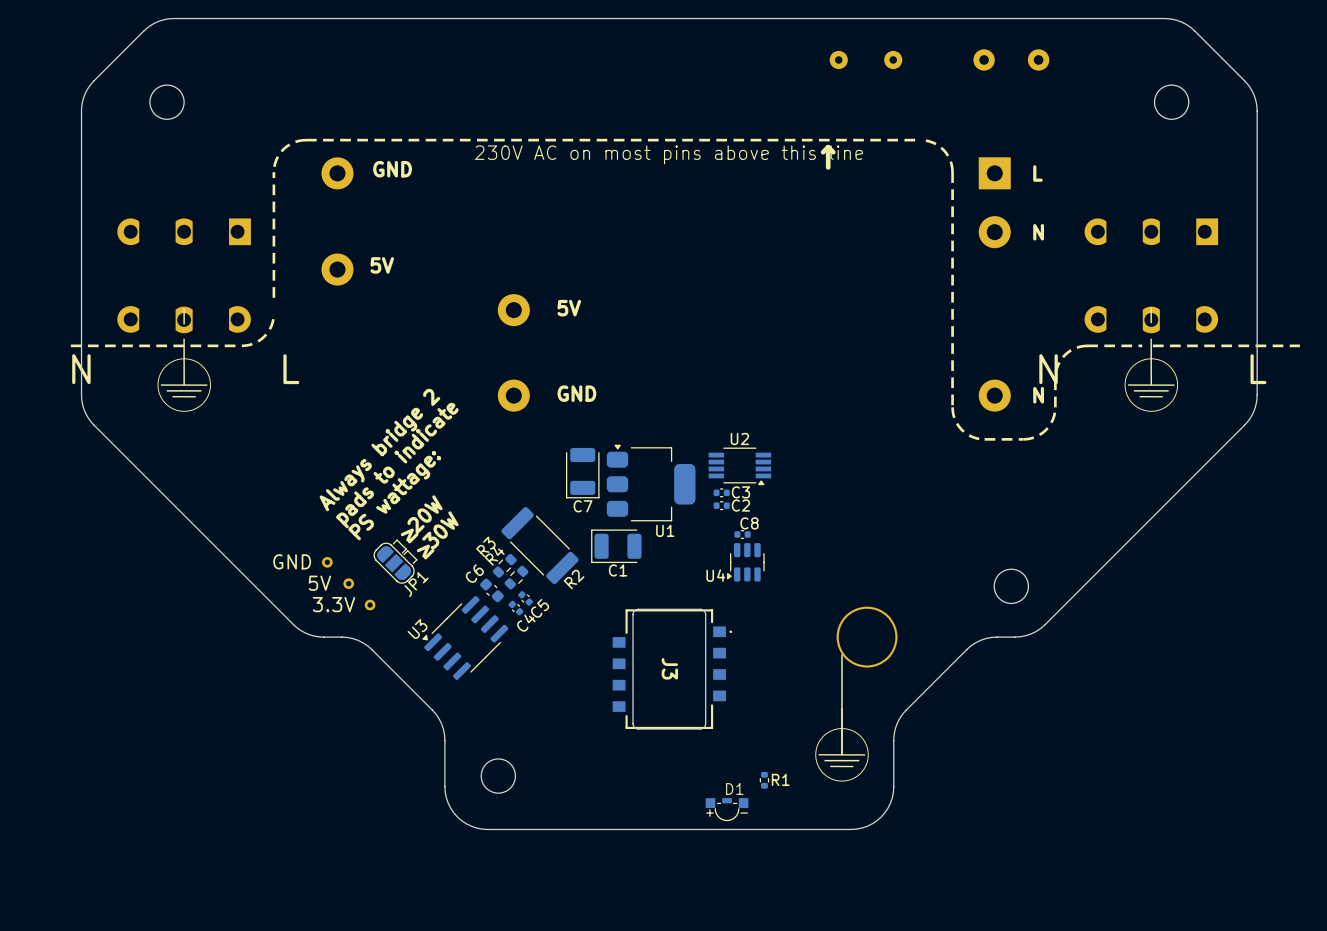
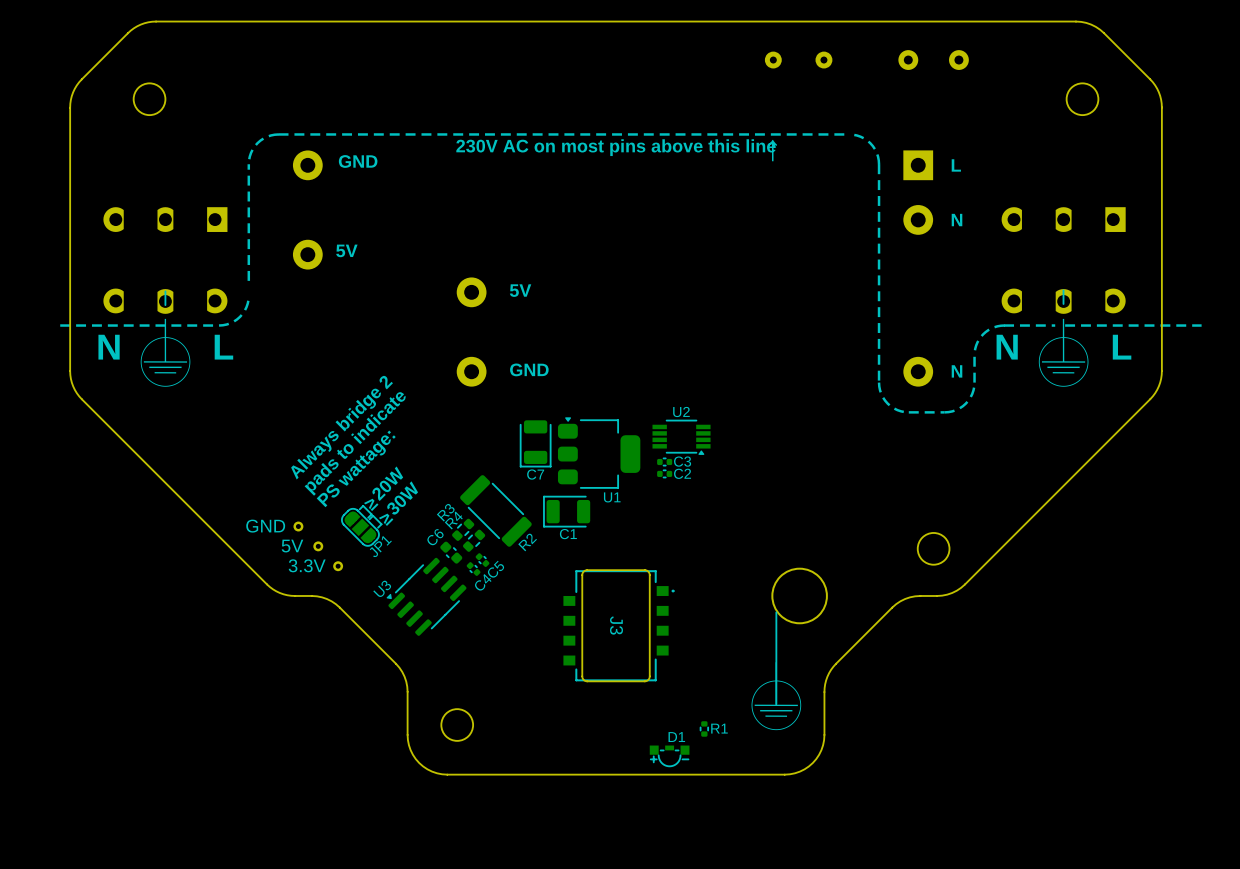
C8: (742, 534) -> none
U4: (745, 562) -> none

